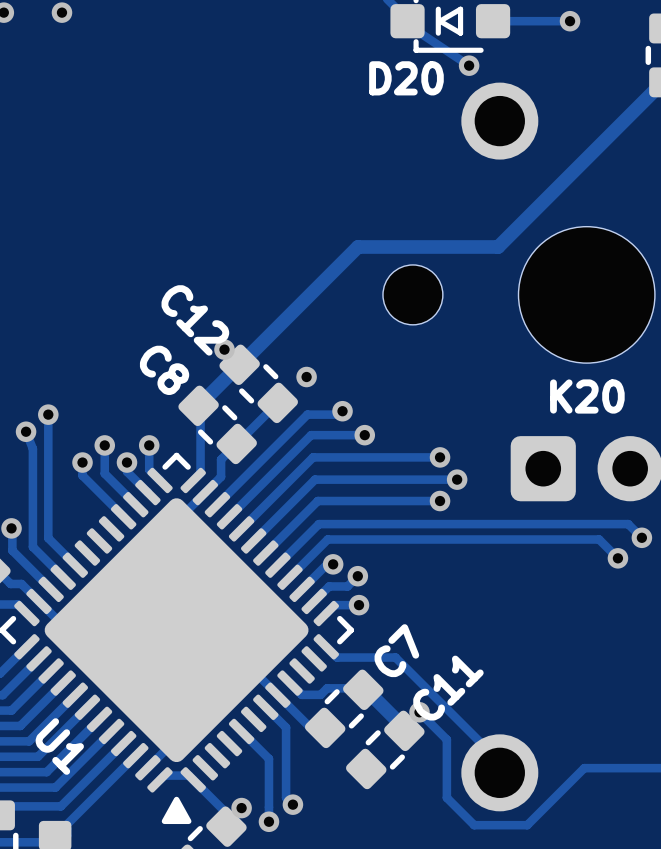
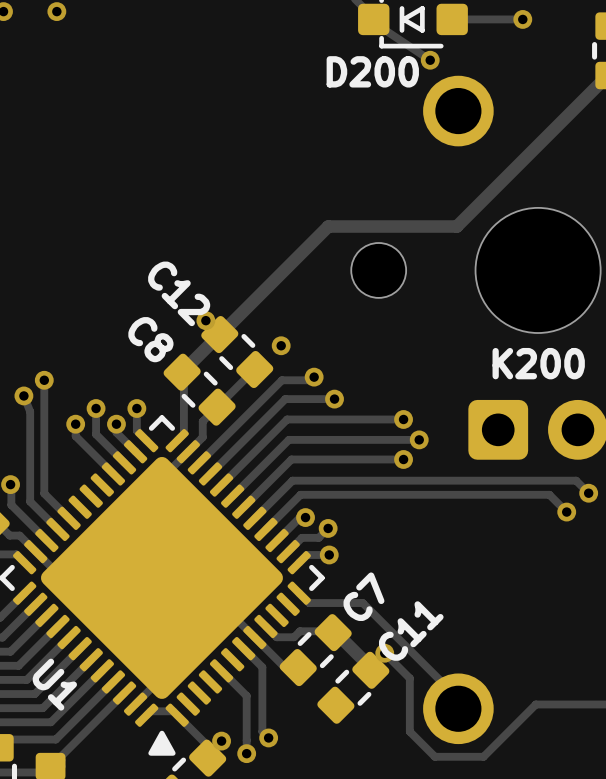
D200 text: D20 (406, 78) -> none
D200 name: none -> D200 (372, 71)
K200 text: K20 (587, 396) -> none
K200 name: none -> K200 (538, 363)

